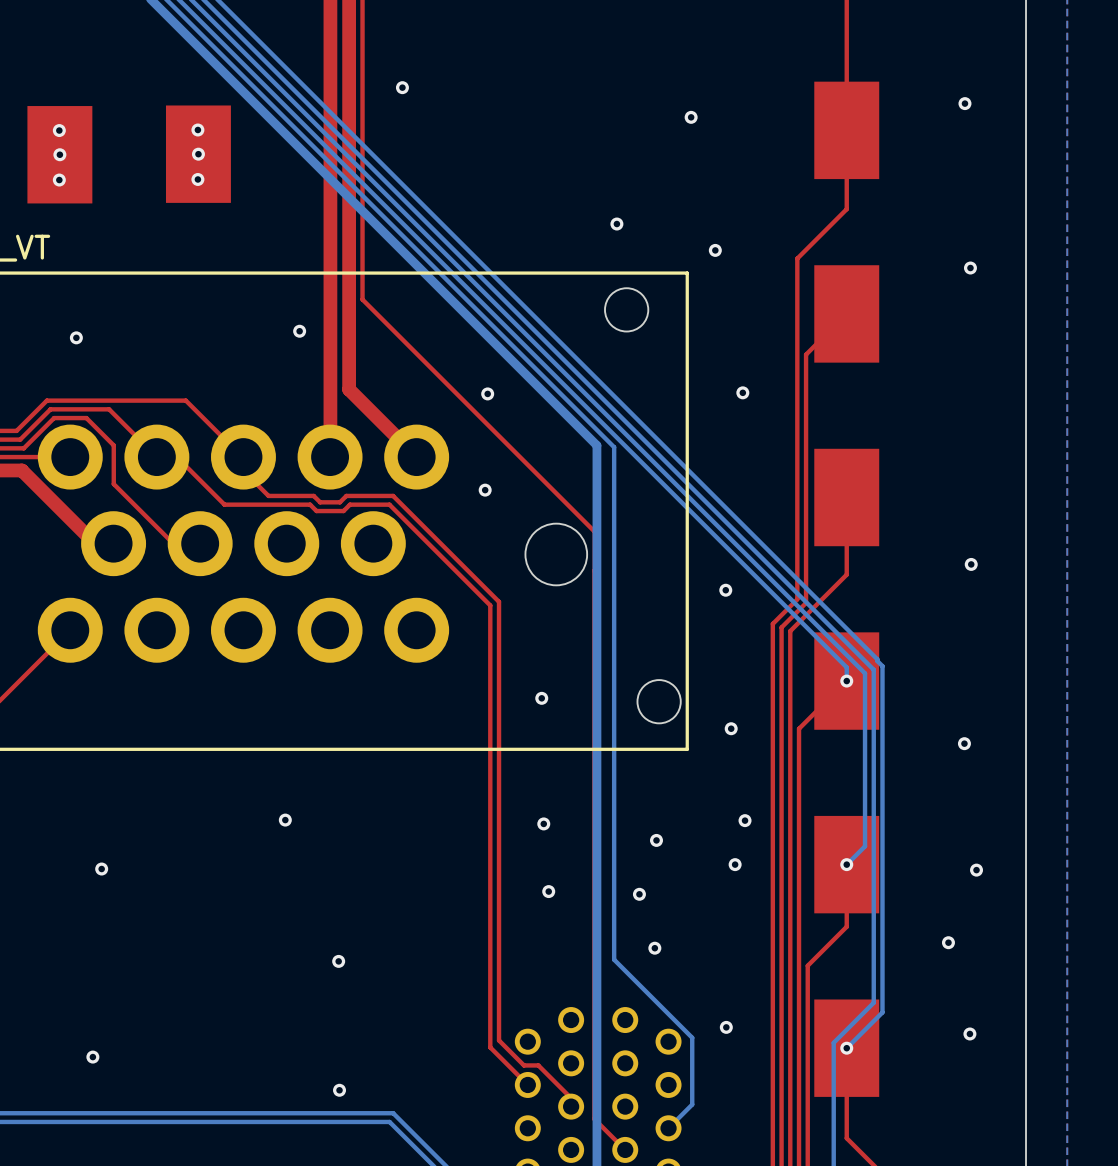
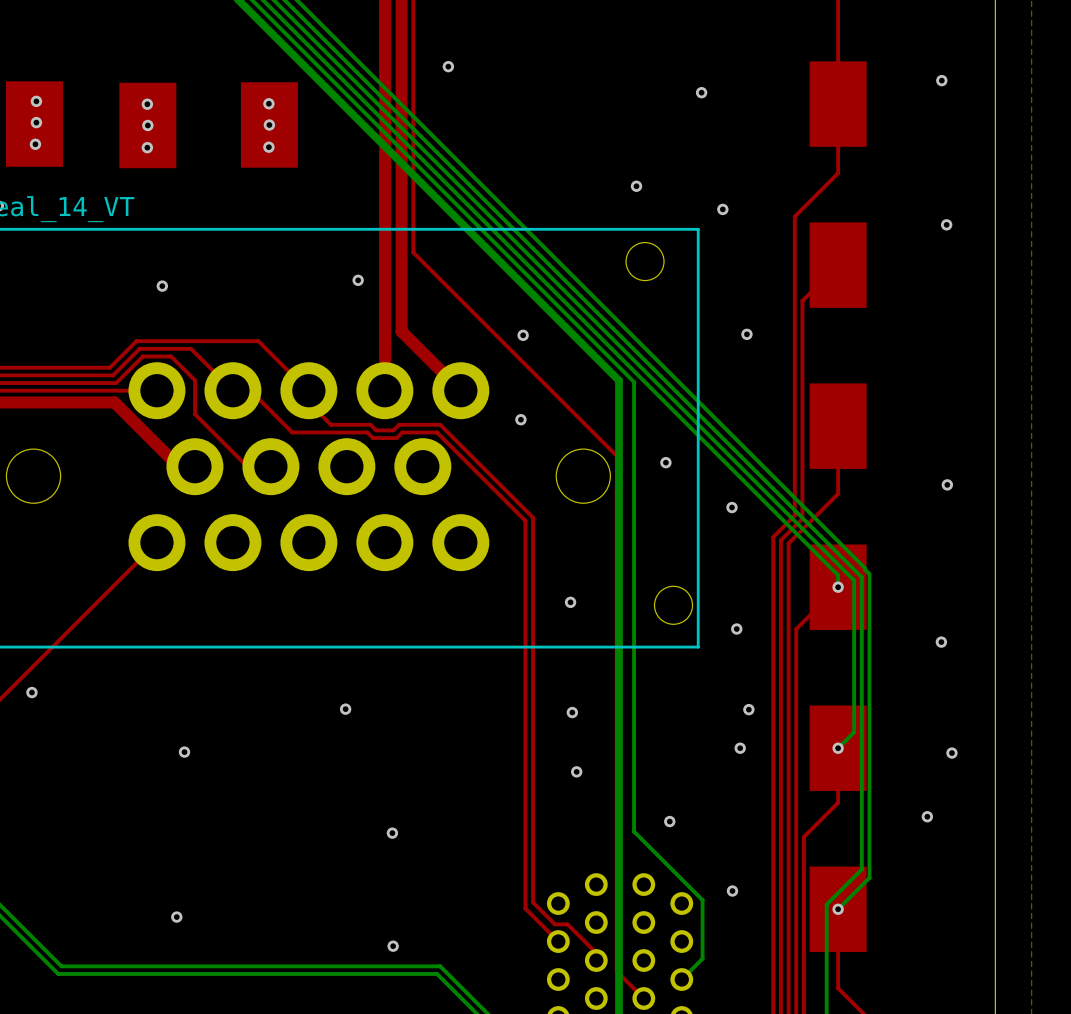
via: none -> (665, 462)
via: (656, 840) -> none
via: (639, 894) -> none
via: (969, 1033) -> none

